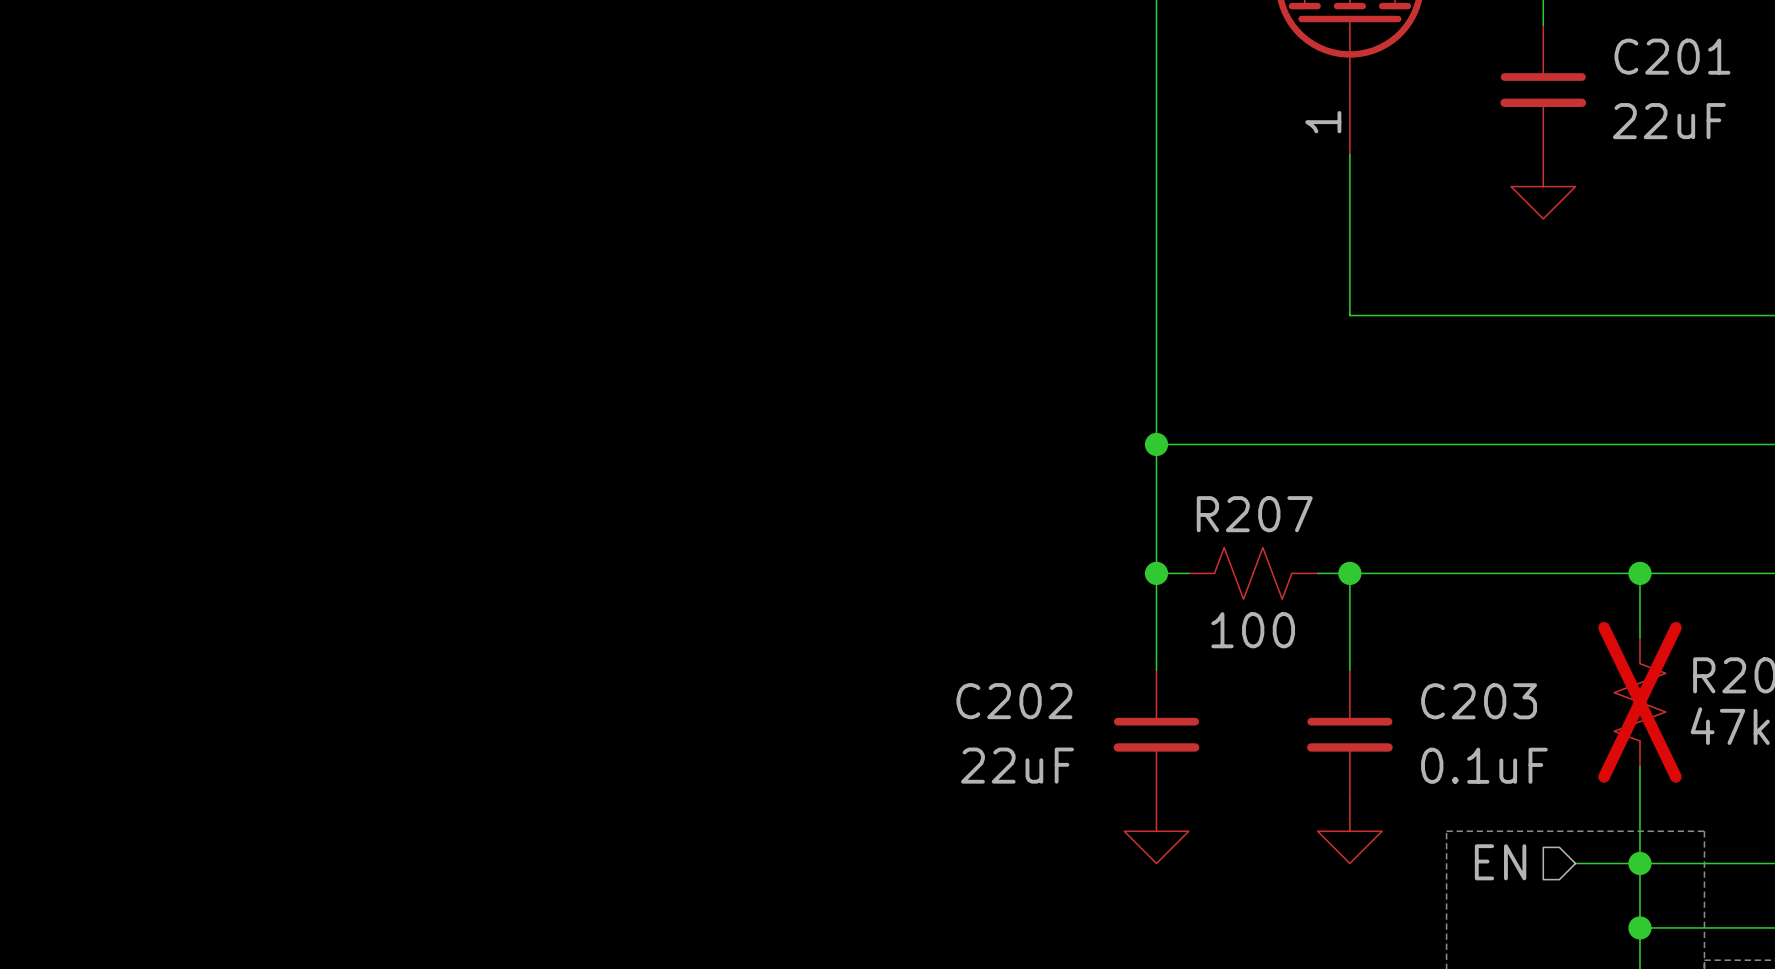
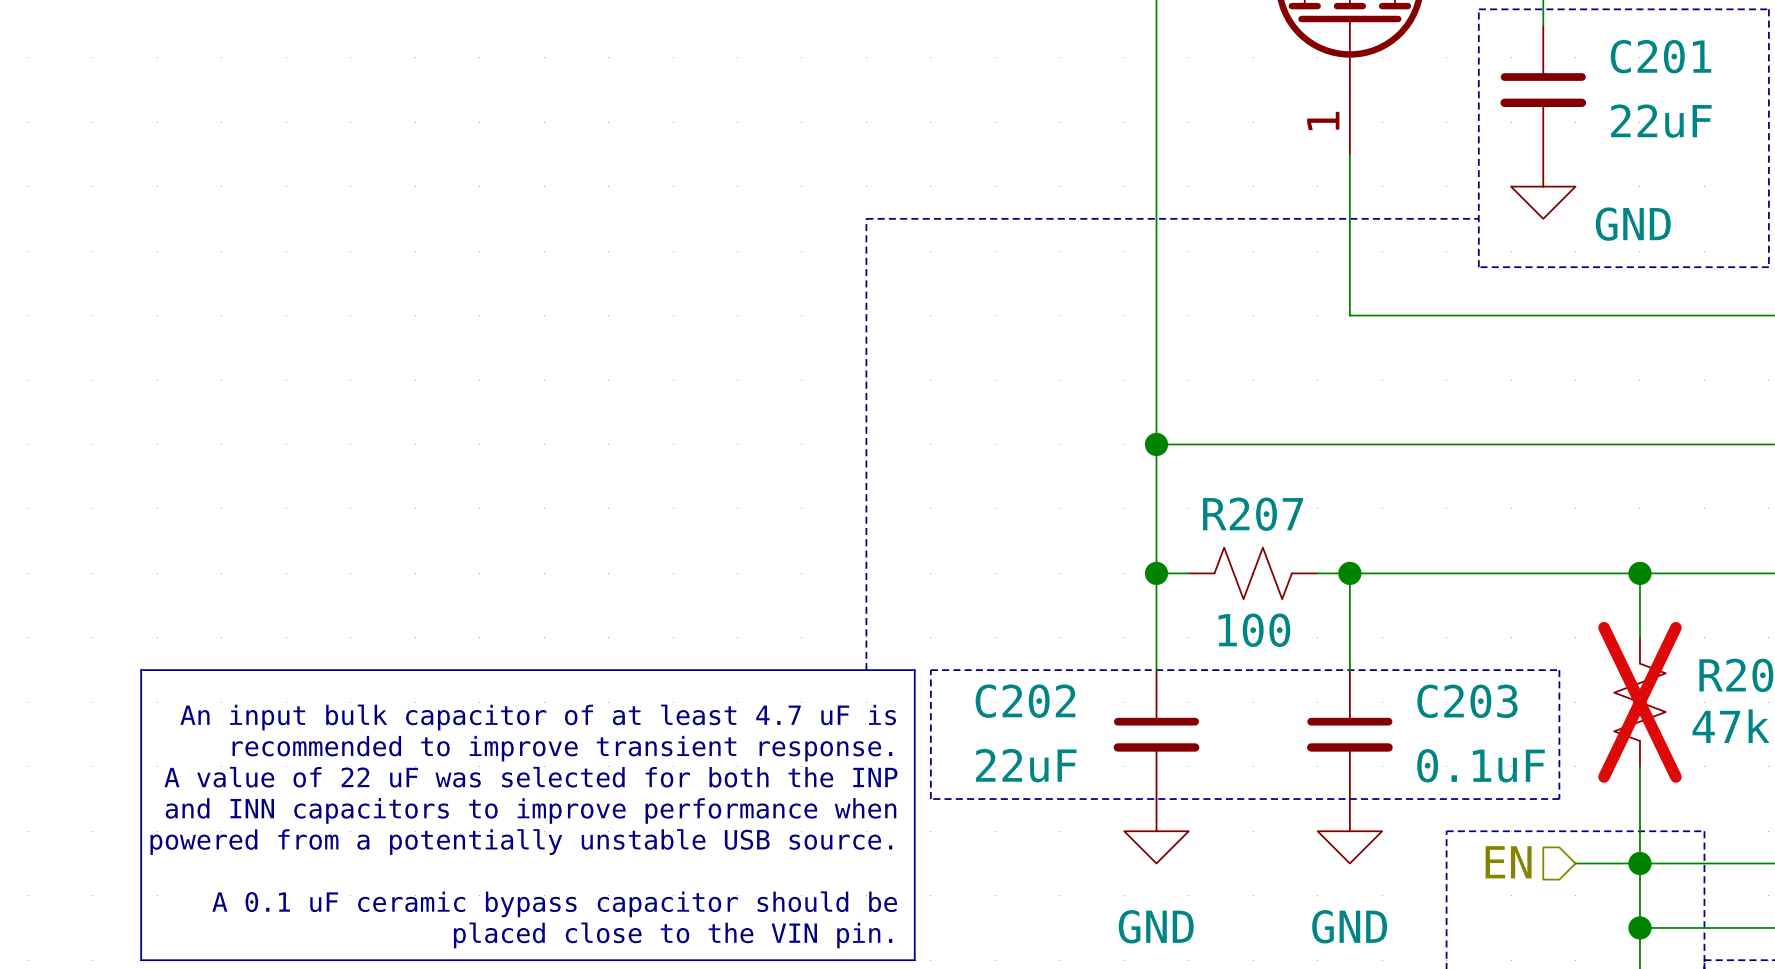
line: none -> (1478, 9) (1768, 9) (1768, 267) (1478, 267) (1478, 9)
line: none -> (1478, 218) (866, 218) (866, 670)
power symbol text: none -> GND (1633, 224)
line: none -> (141, 670) (914, 670) (914, 960) (141, 960) (141, 670)
line: none -> (930, 670) (1559, 670) (1559, 799) (930, 799) (930, 670)
text: none -> An input bulk capacitor of at least 4.7 uF is (538, 717)
text: none -> recommended to improve transient response. (562, 748)
text: none -> A value of 22 uF was selected for both the INP (530, 777)
text: none -> and INN capacitors to improve performance when (531, 810)
text: none -> powered from a potentially unstable USB source. (521, 842)
text: none -> A 0.1 uF ceramic bypass capacitor should be (554, 904)
power symbol text: none -> GND (1156, 926)
power symbol text: none -> GND (1349, 926)
text: none -> placed close to the VIN pin. (673, 935)

